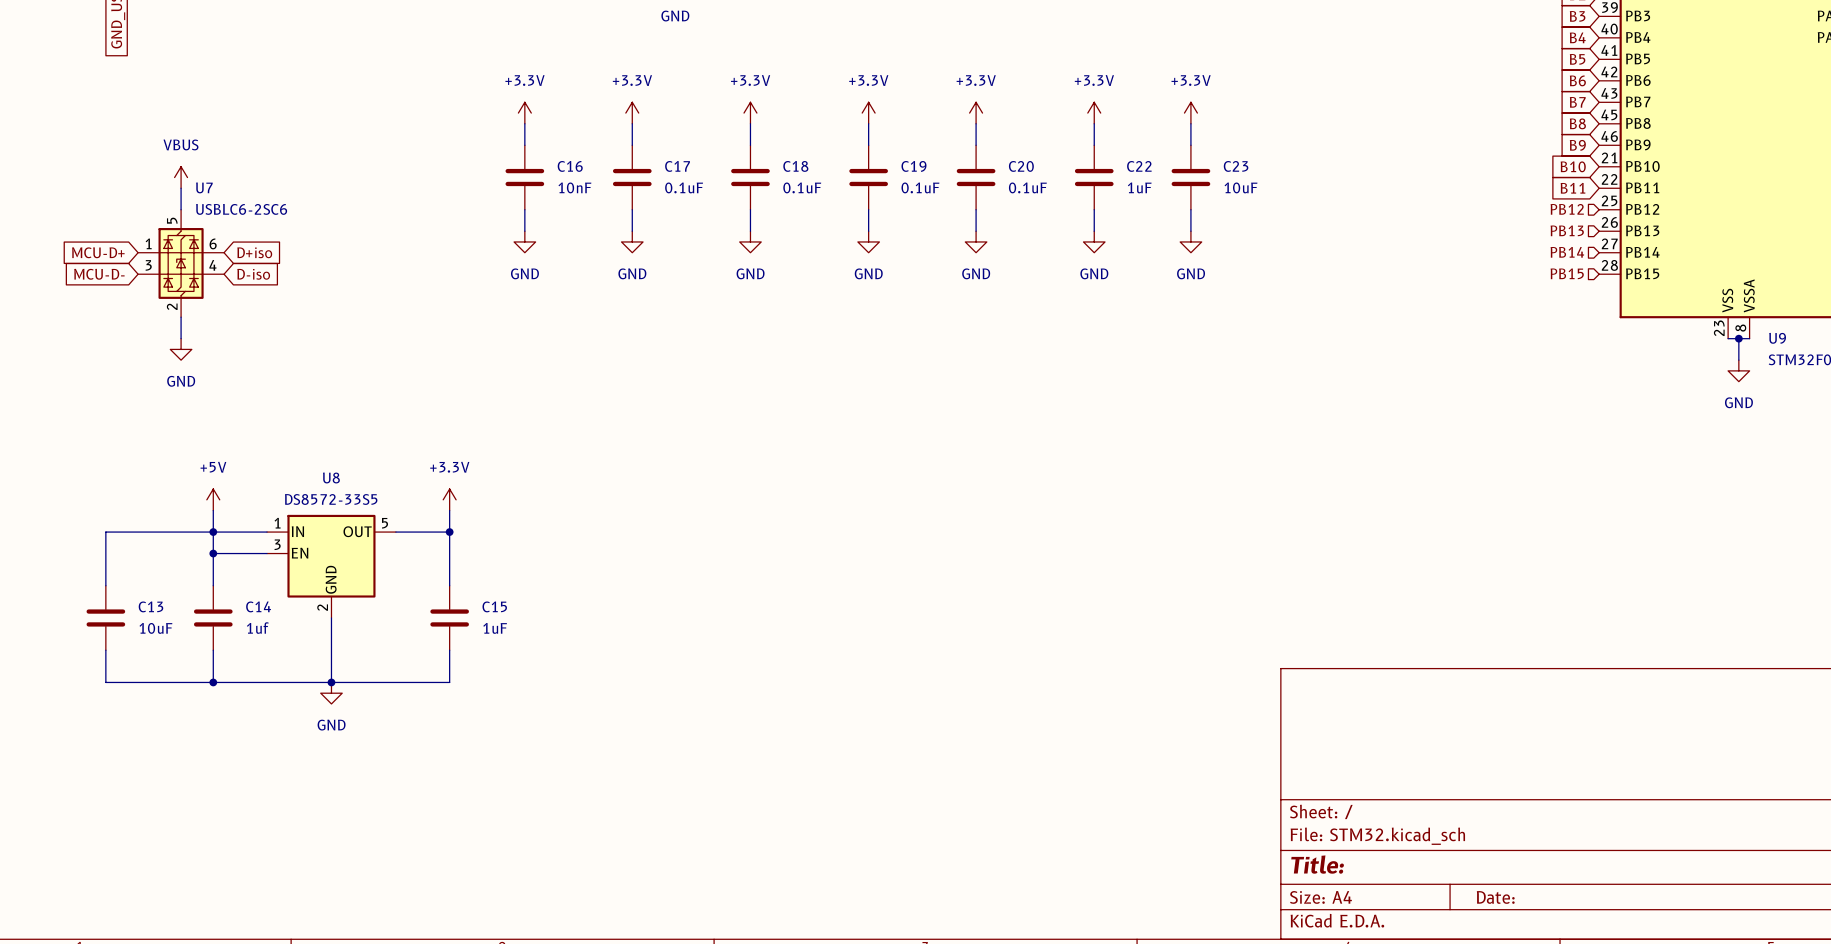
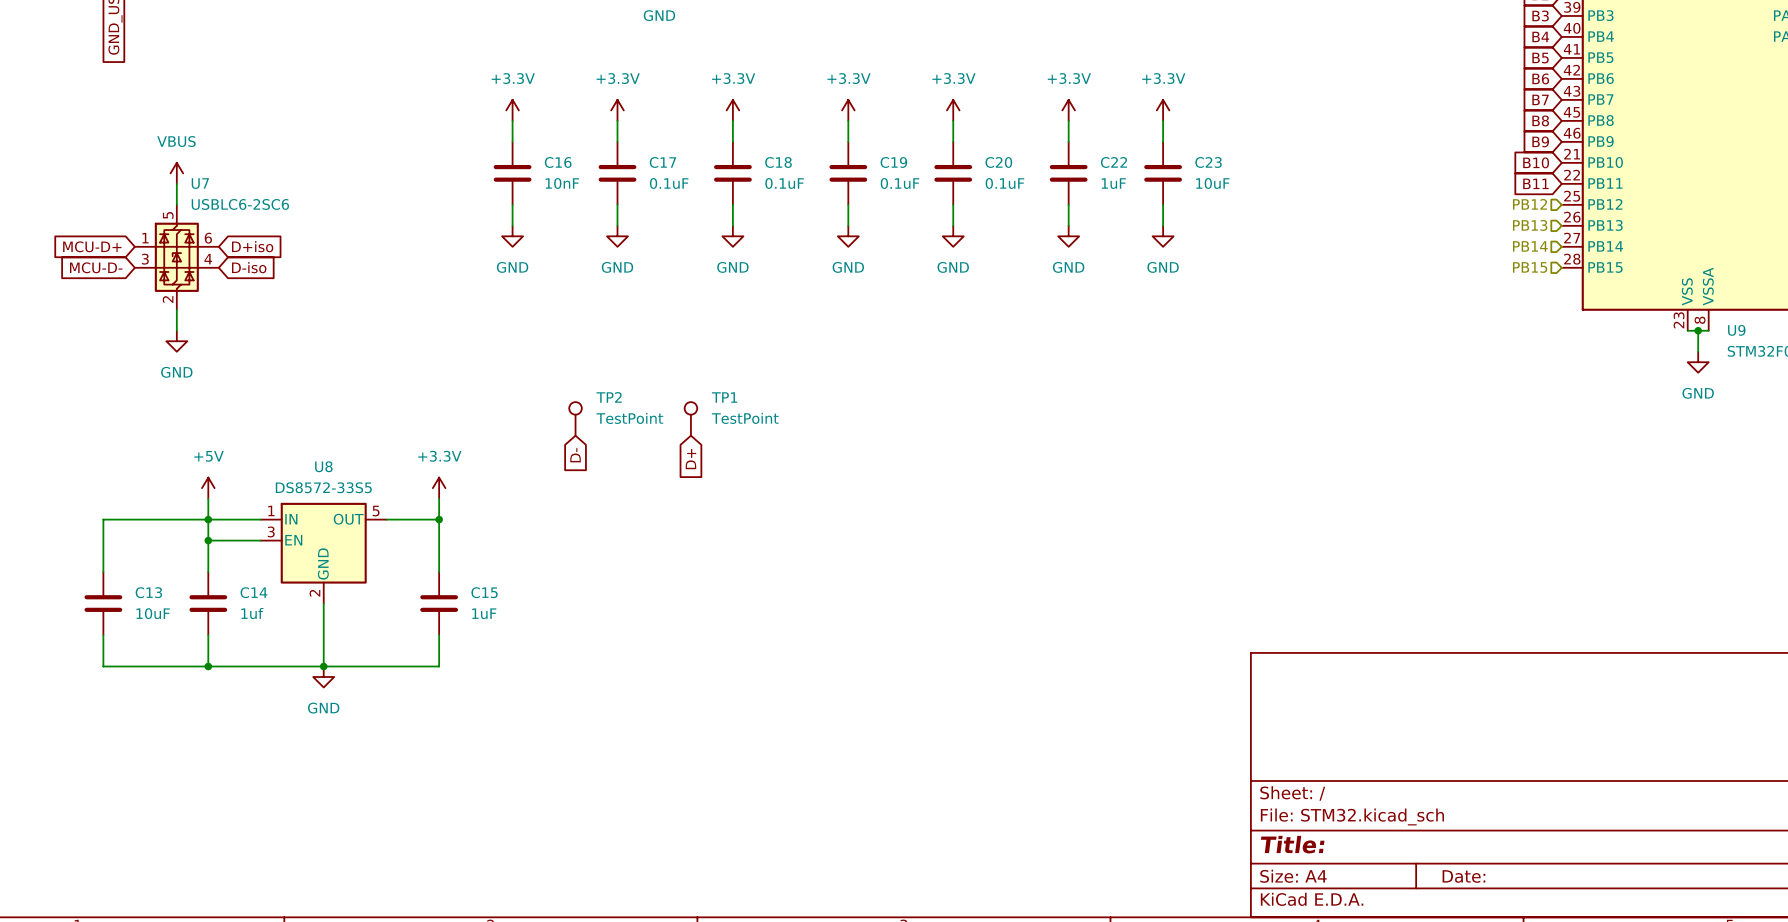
TP2: none -> TestPoint (575, 418)
TP1: none -> TestPoint (690, 418)
global label: none -> D- (575, 455)
global label: none -> D+ (690, 459)

